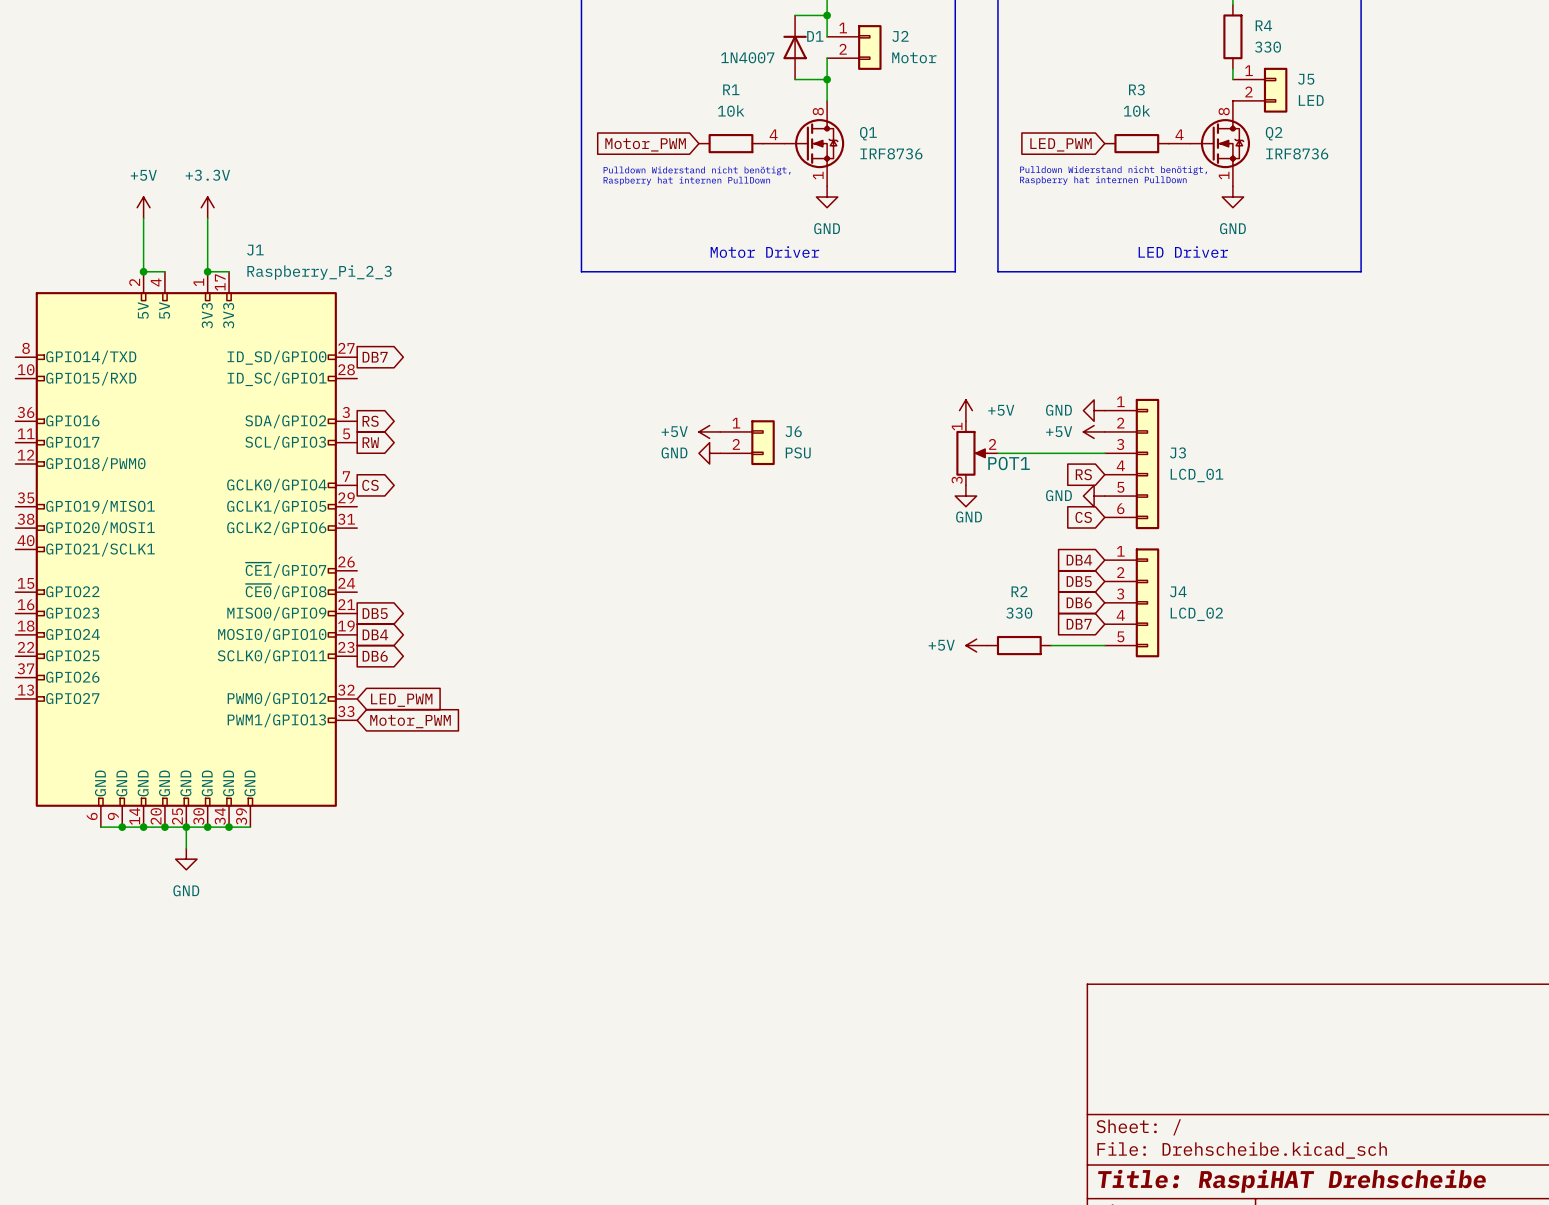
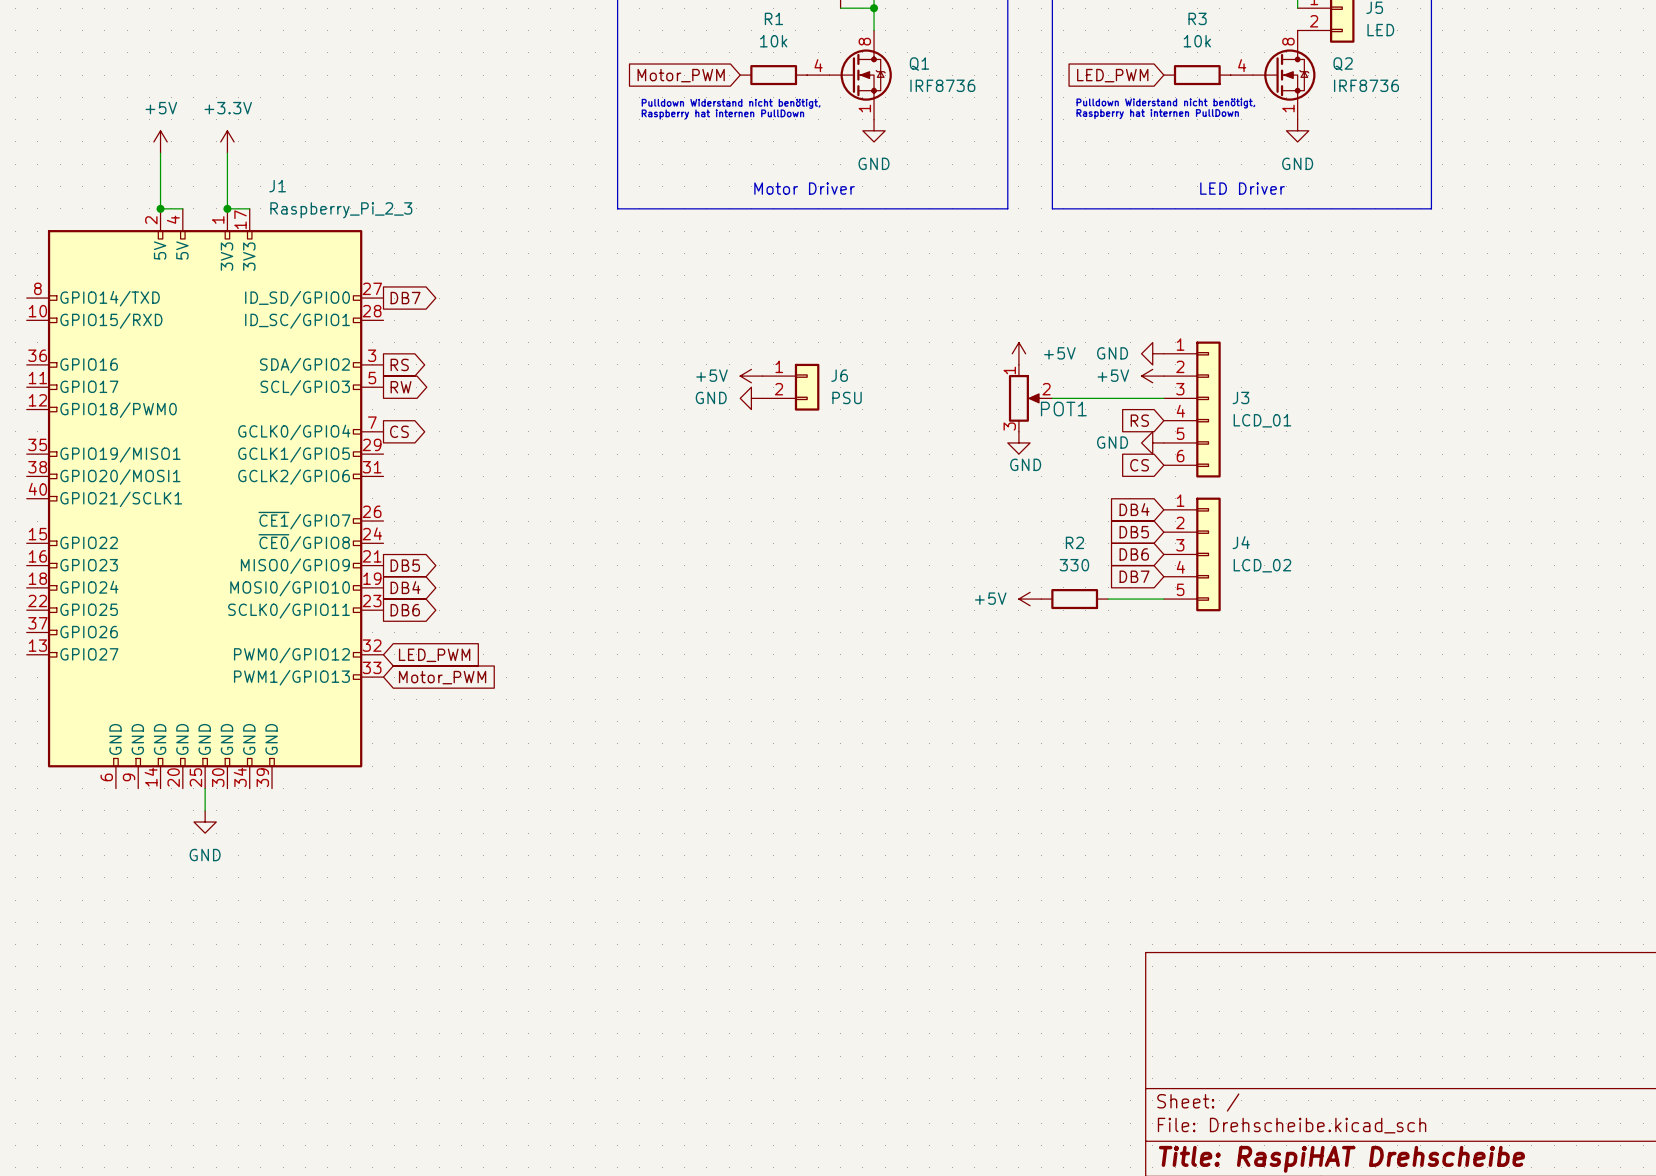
wire: (100, 827) (250, 827) -> none
junction: (122, 827) -> none
junction: (143, 827) -> none
junction: (164, 827) -> none
junction: (186, 827) -> none
junction: (207, 827) -> none
junction: (229, 827) -> none

